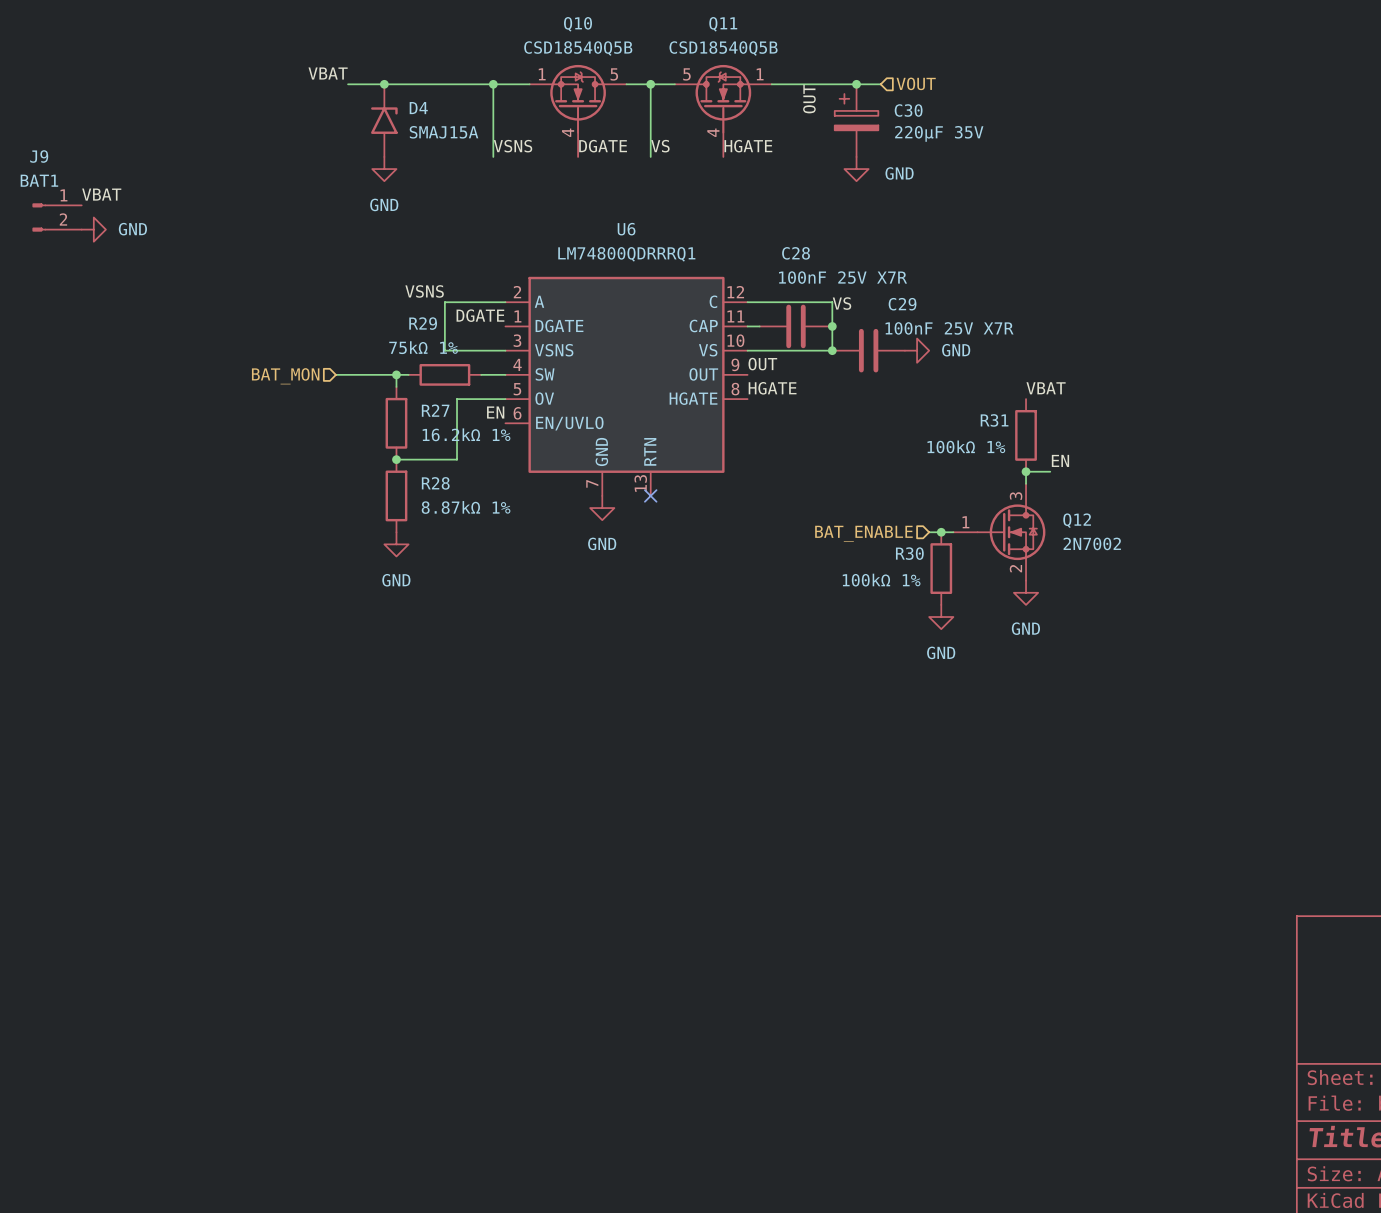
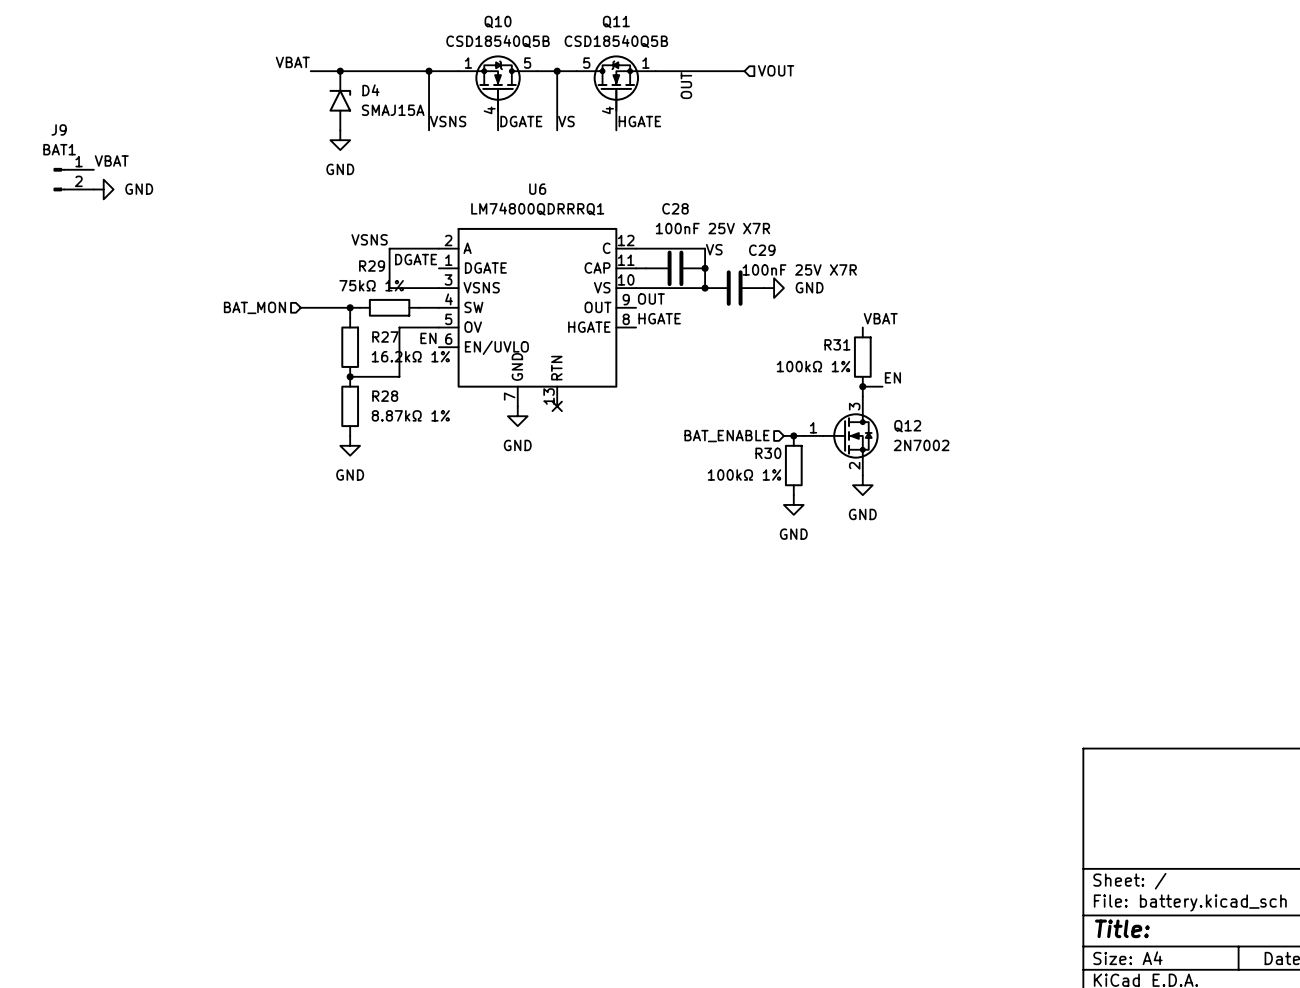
junction: (856, 84) -> none
C30: 220µF 35V (856, 120) -> none
power symbol: GND (856, 169) -> none

